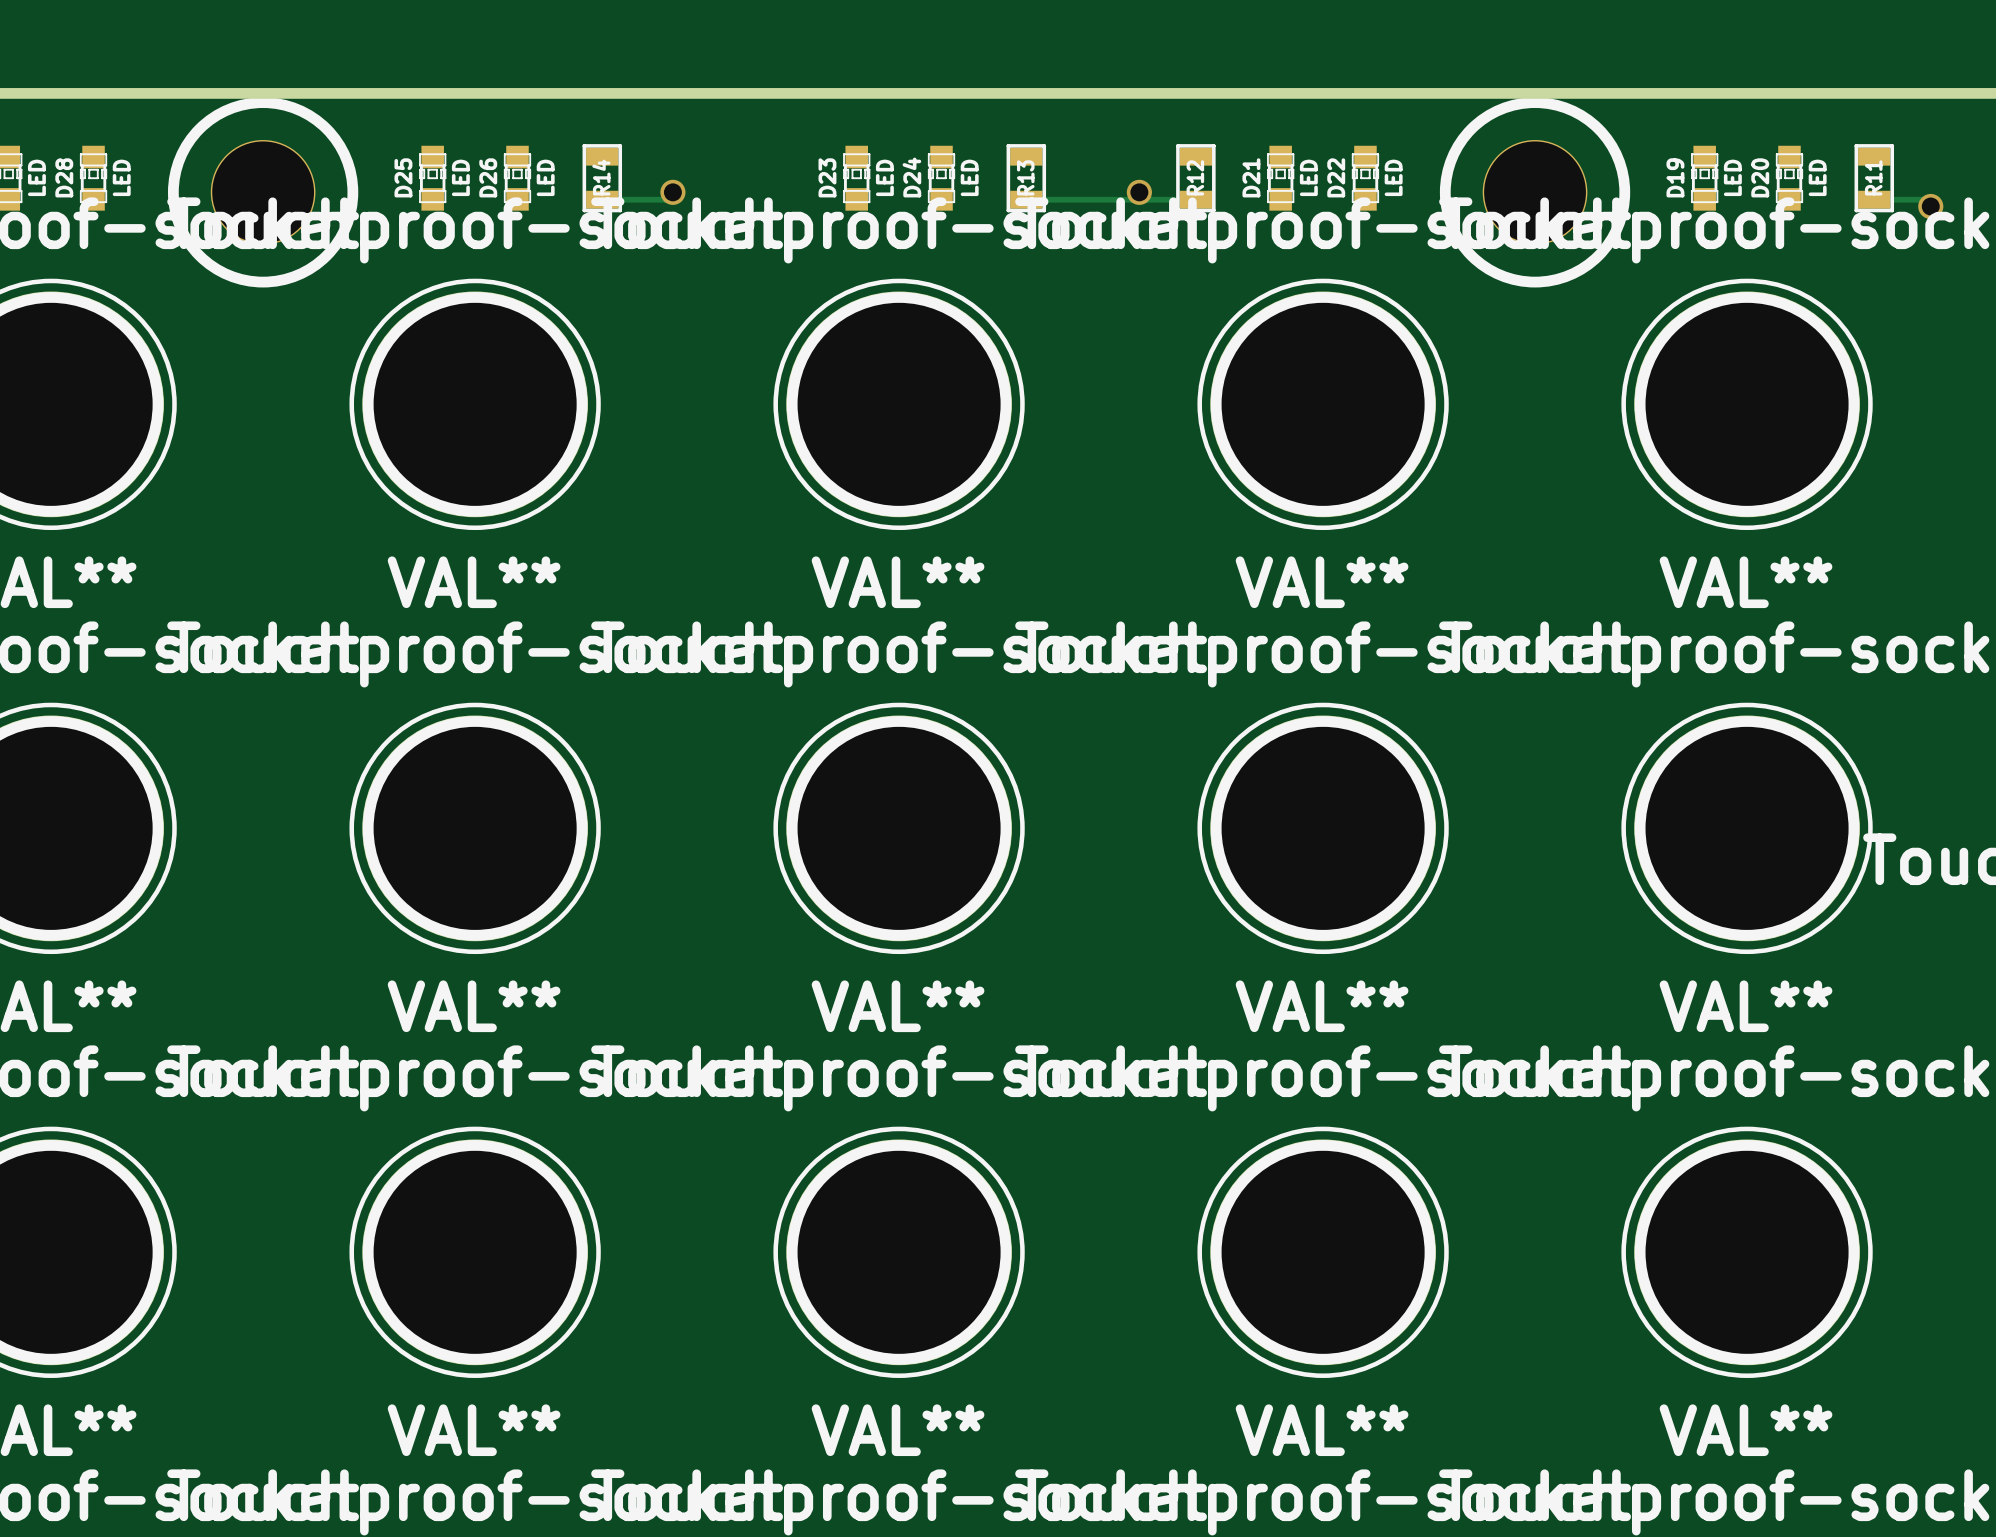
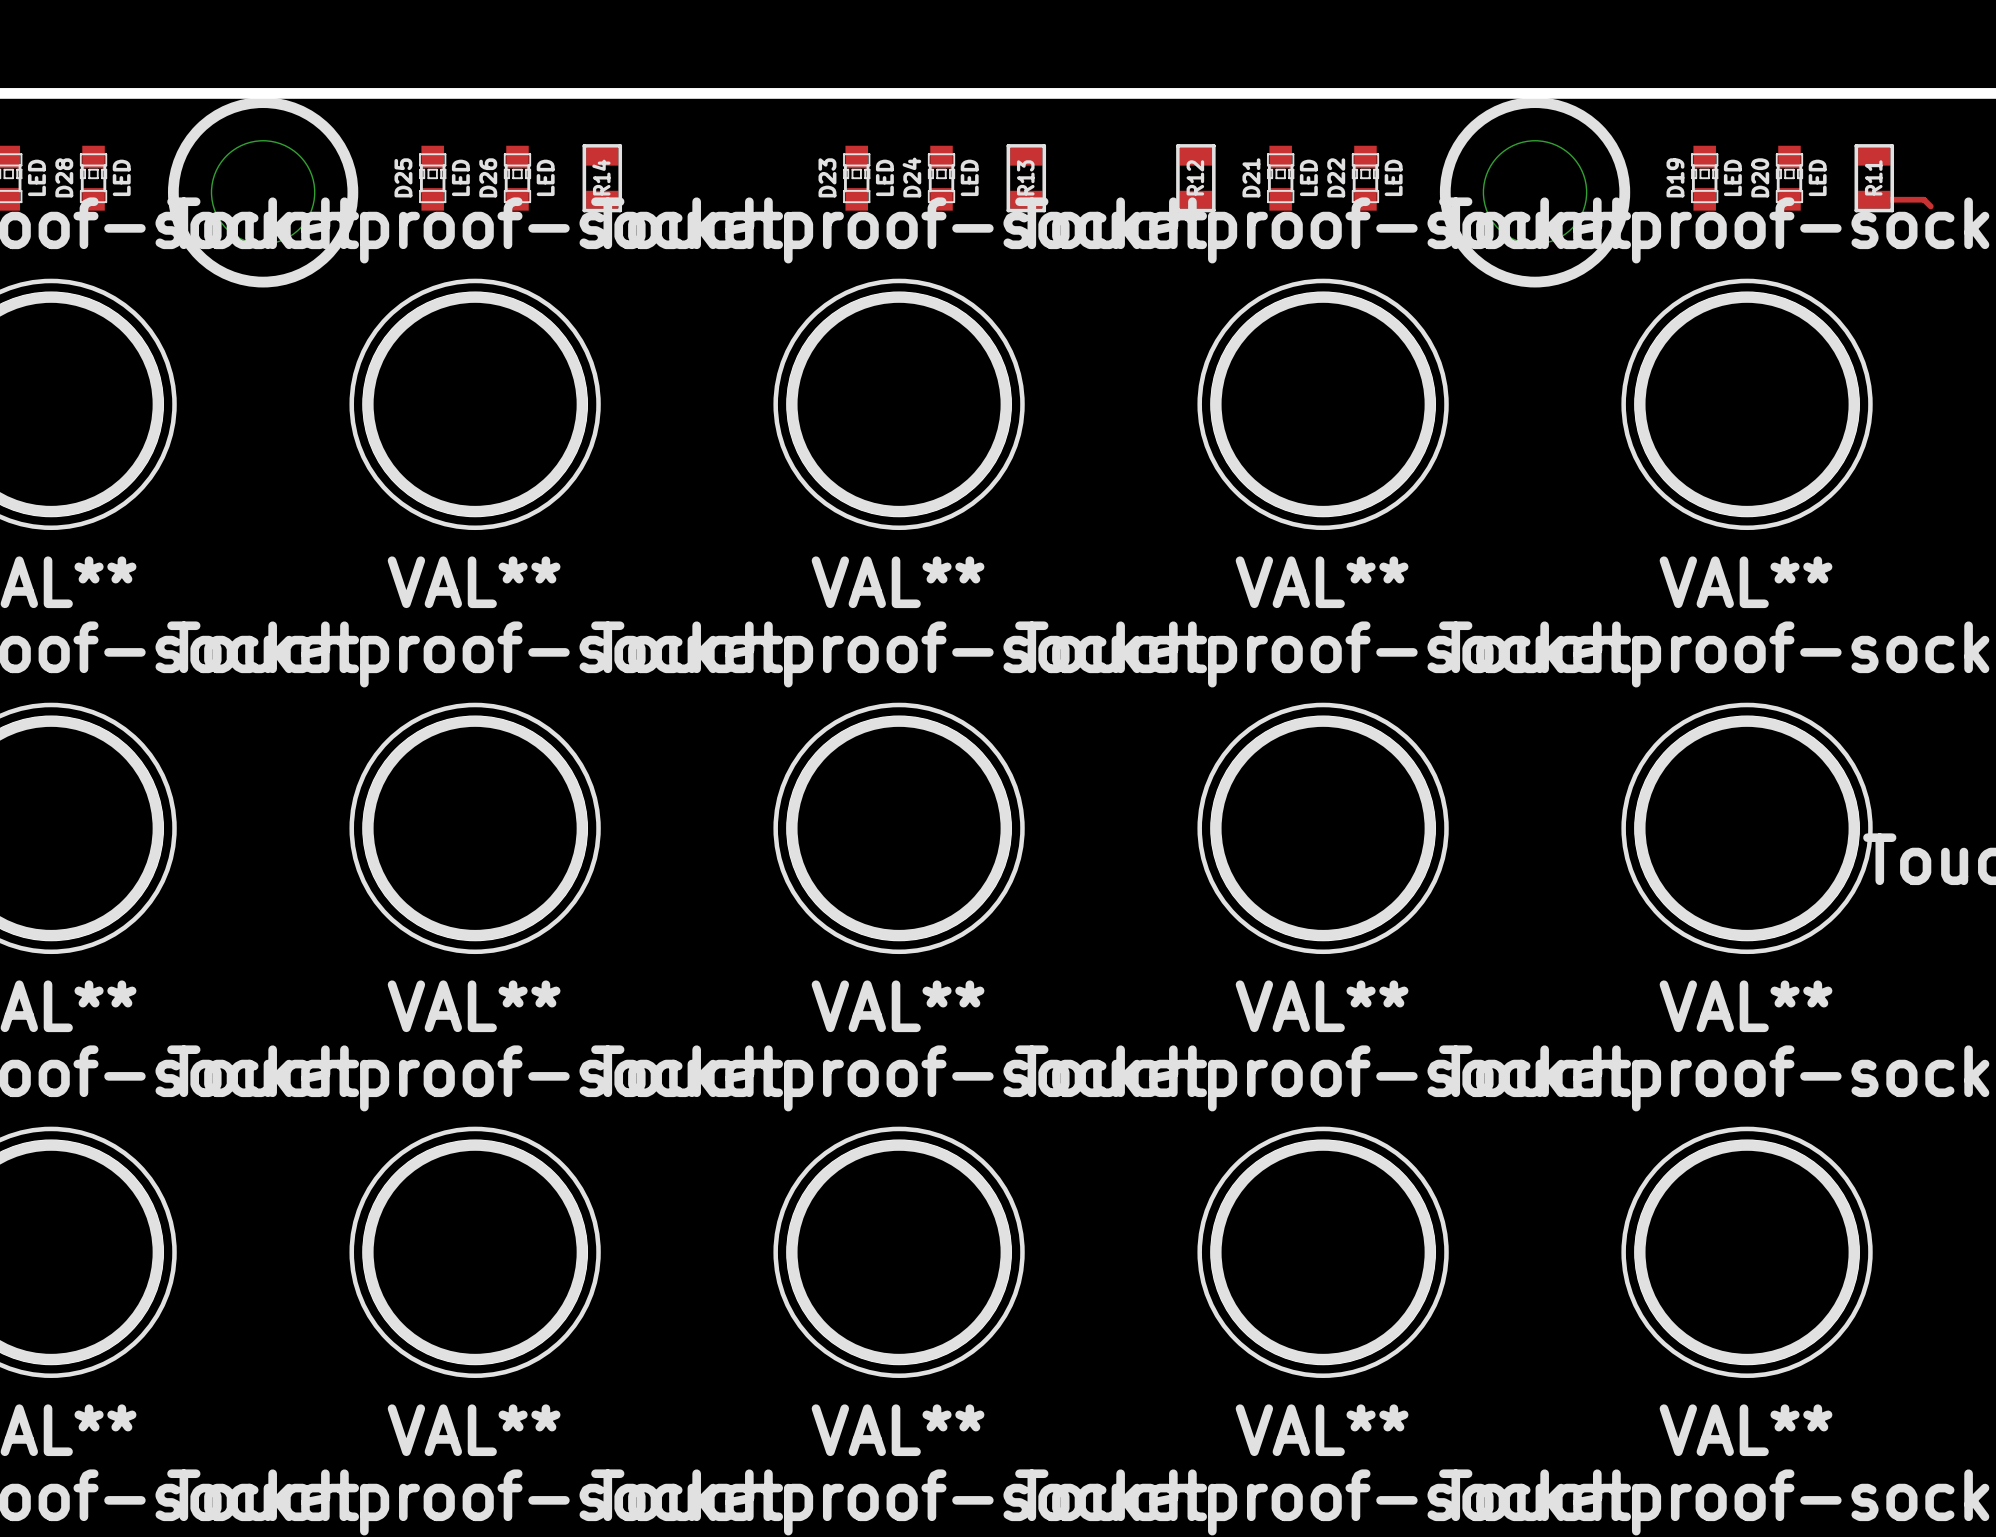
track: (672, 192) (665, 199) (602, 199) -> none
via: (672, 192) -> none
via: (1139, 192) -> none
track: (1026, 199) (1131, 199) (1139, 192) (1146, 199) (1195, 199) -> none
via: (1930, 206) -> none

